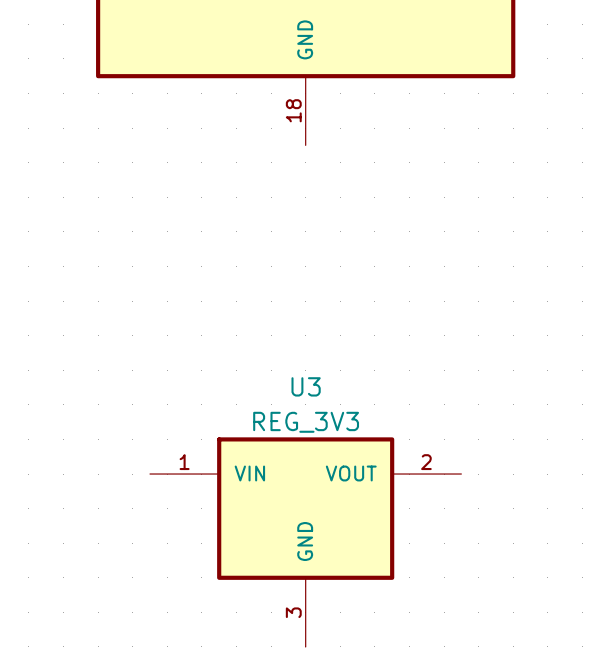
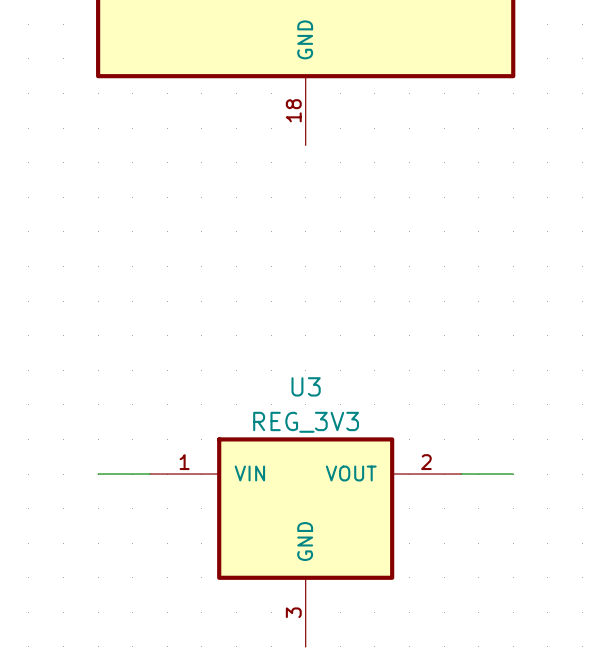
wire: none -> (98, 474) (150, 474)
wire: none -> (461, 474) (513, 474)

